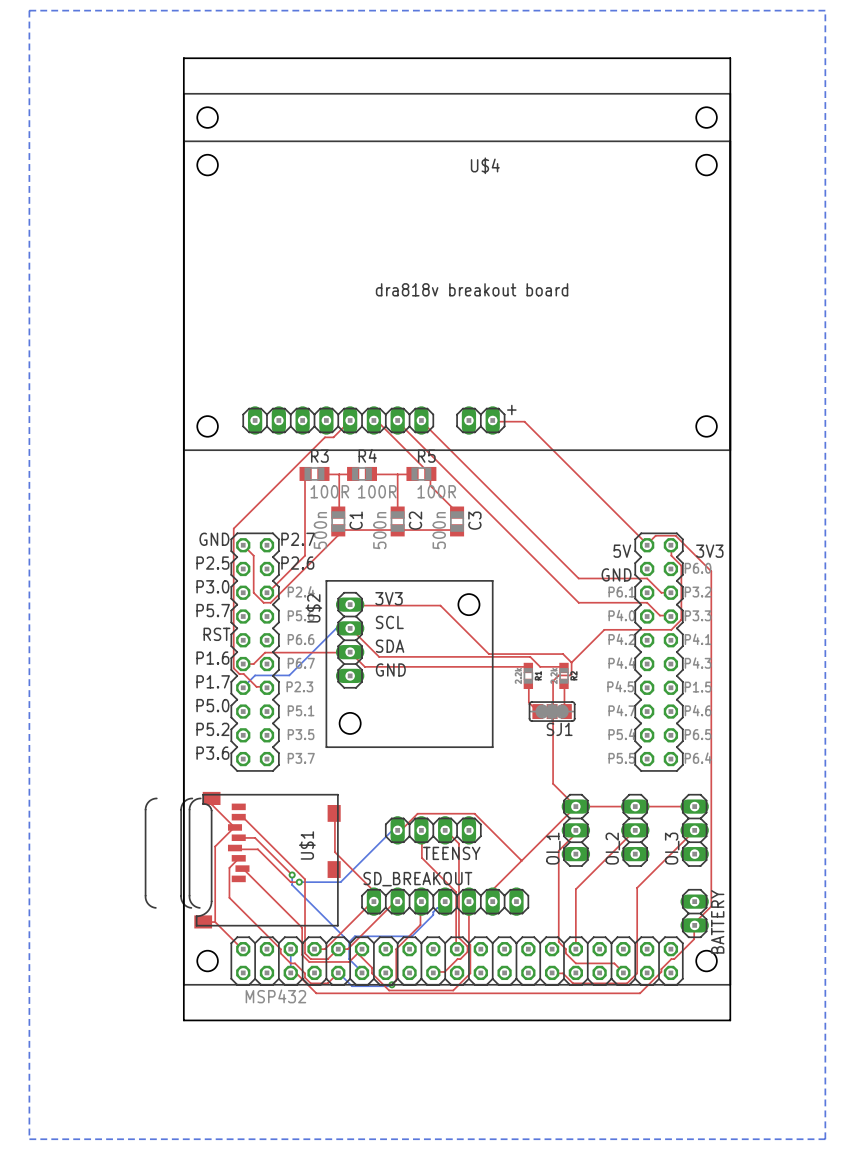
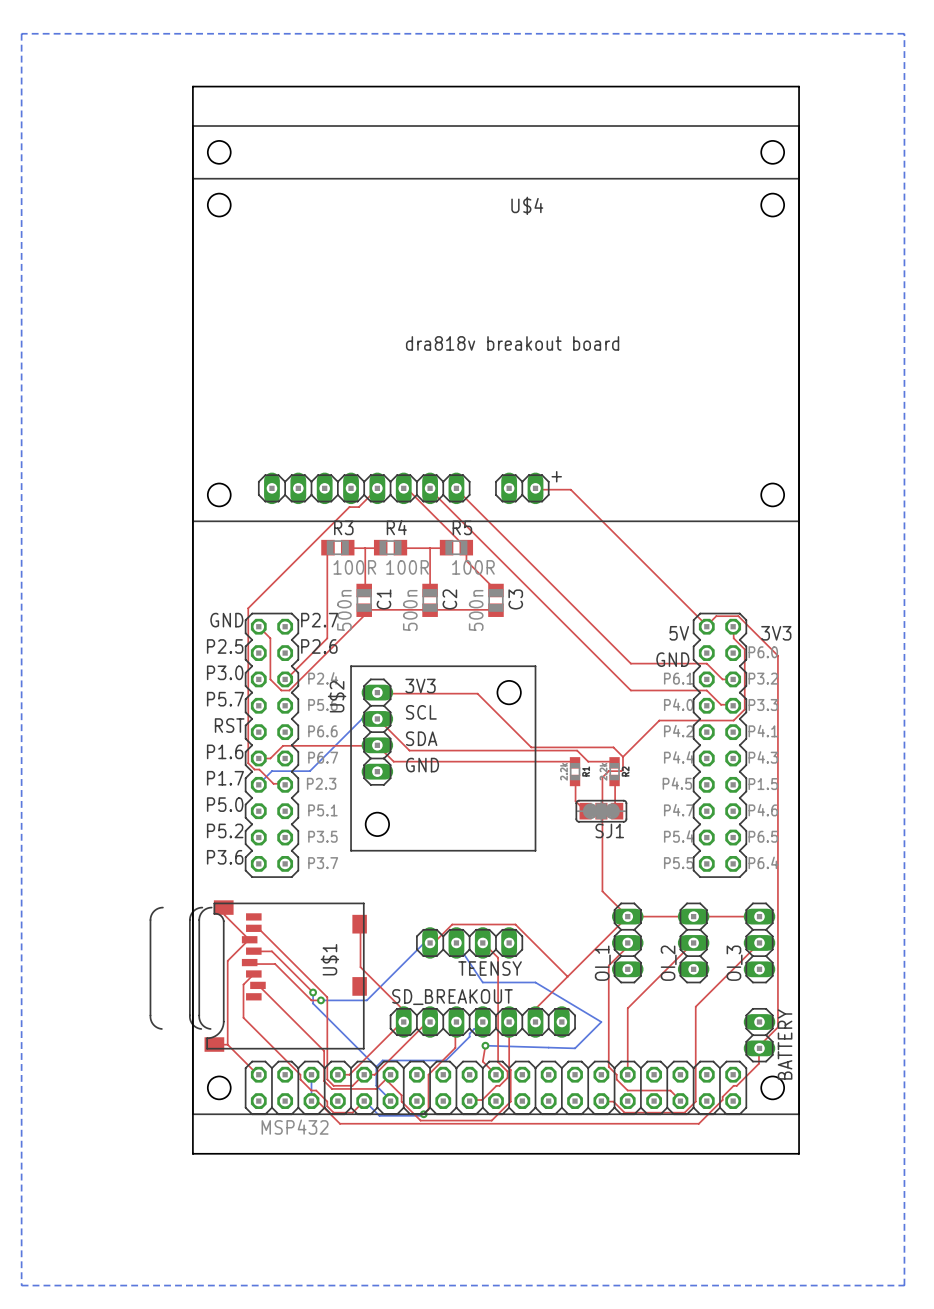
top track: (421, 830) (421, 857) (456, 892) (457, 949) -> (485, 1045) (482, 1061) (495, 1074)
bottom track: none -> (456, 942) (482, 982) (535, 982) (601, 1022) (575, 1048) (485, 1045)
via: none -> (485, 1045)

